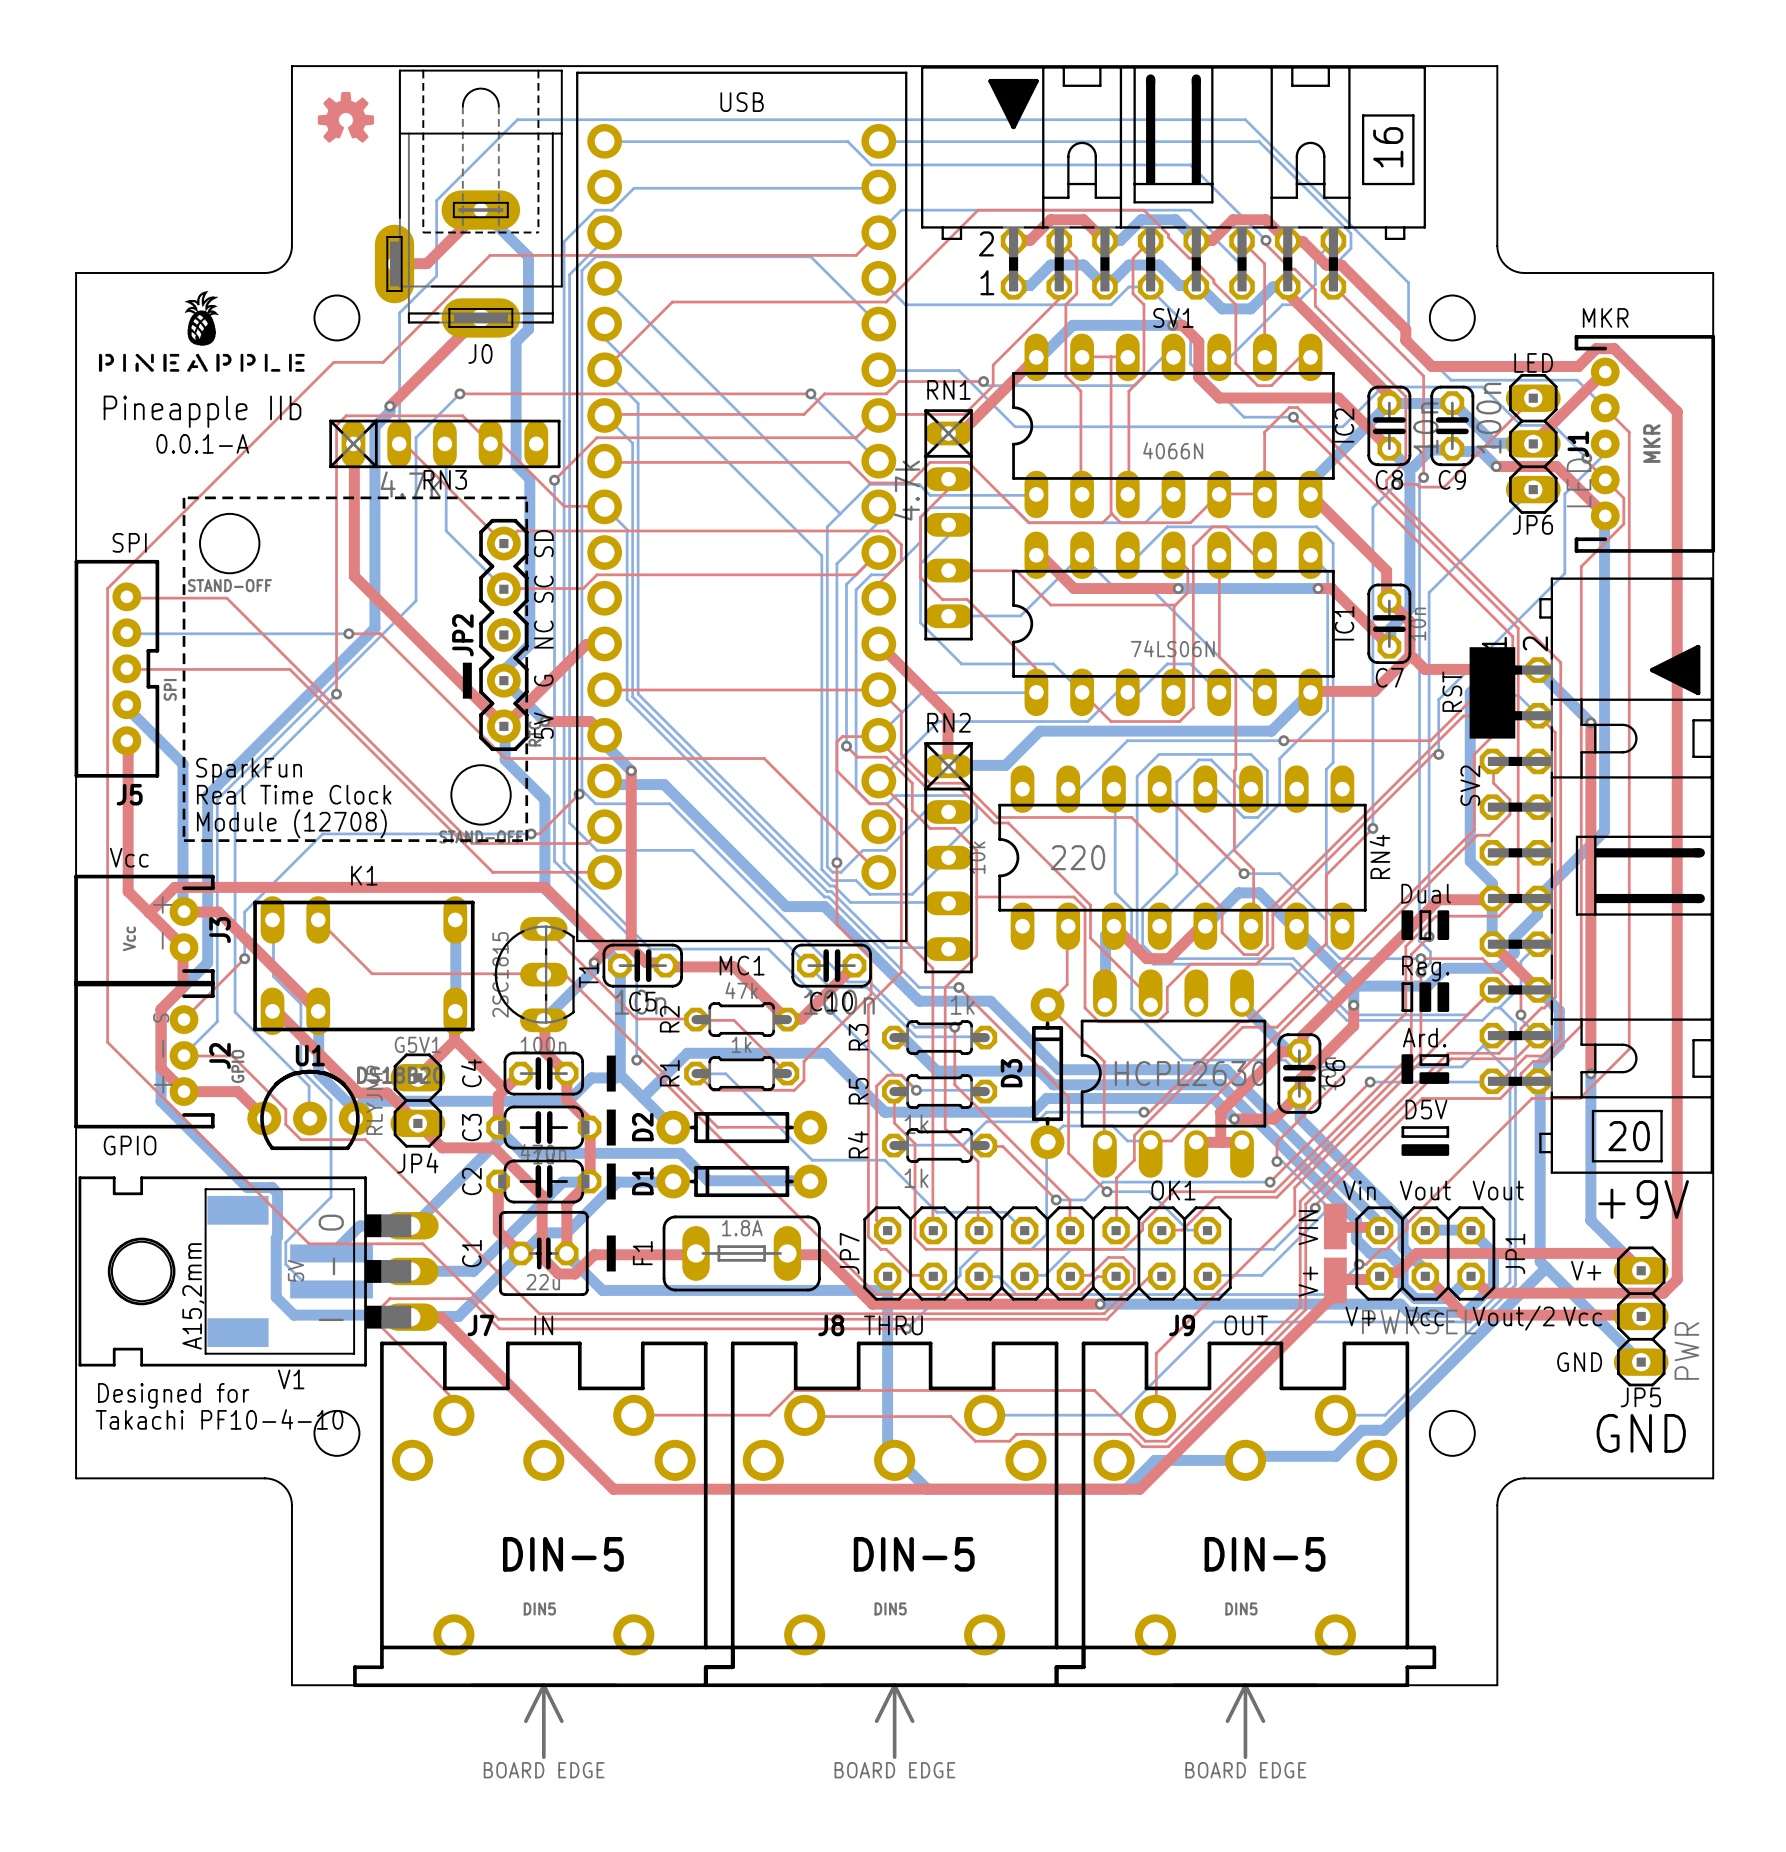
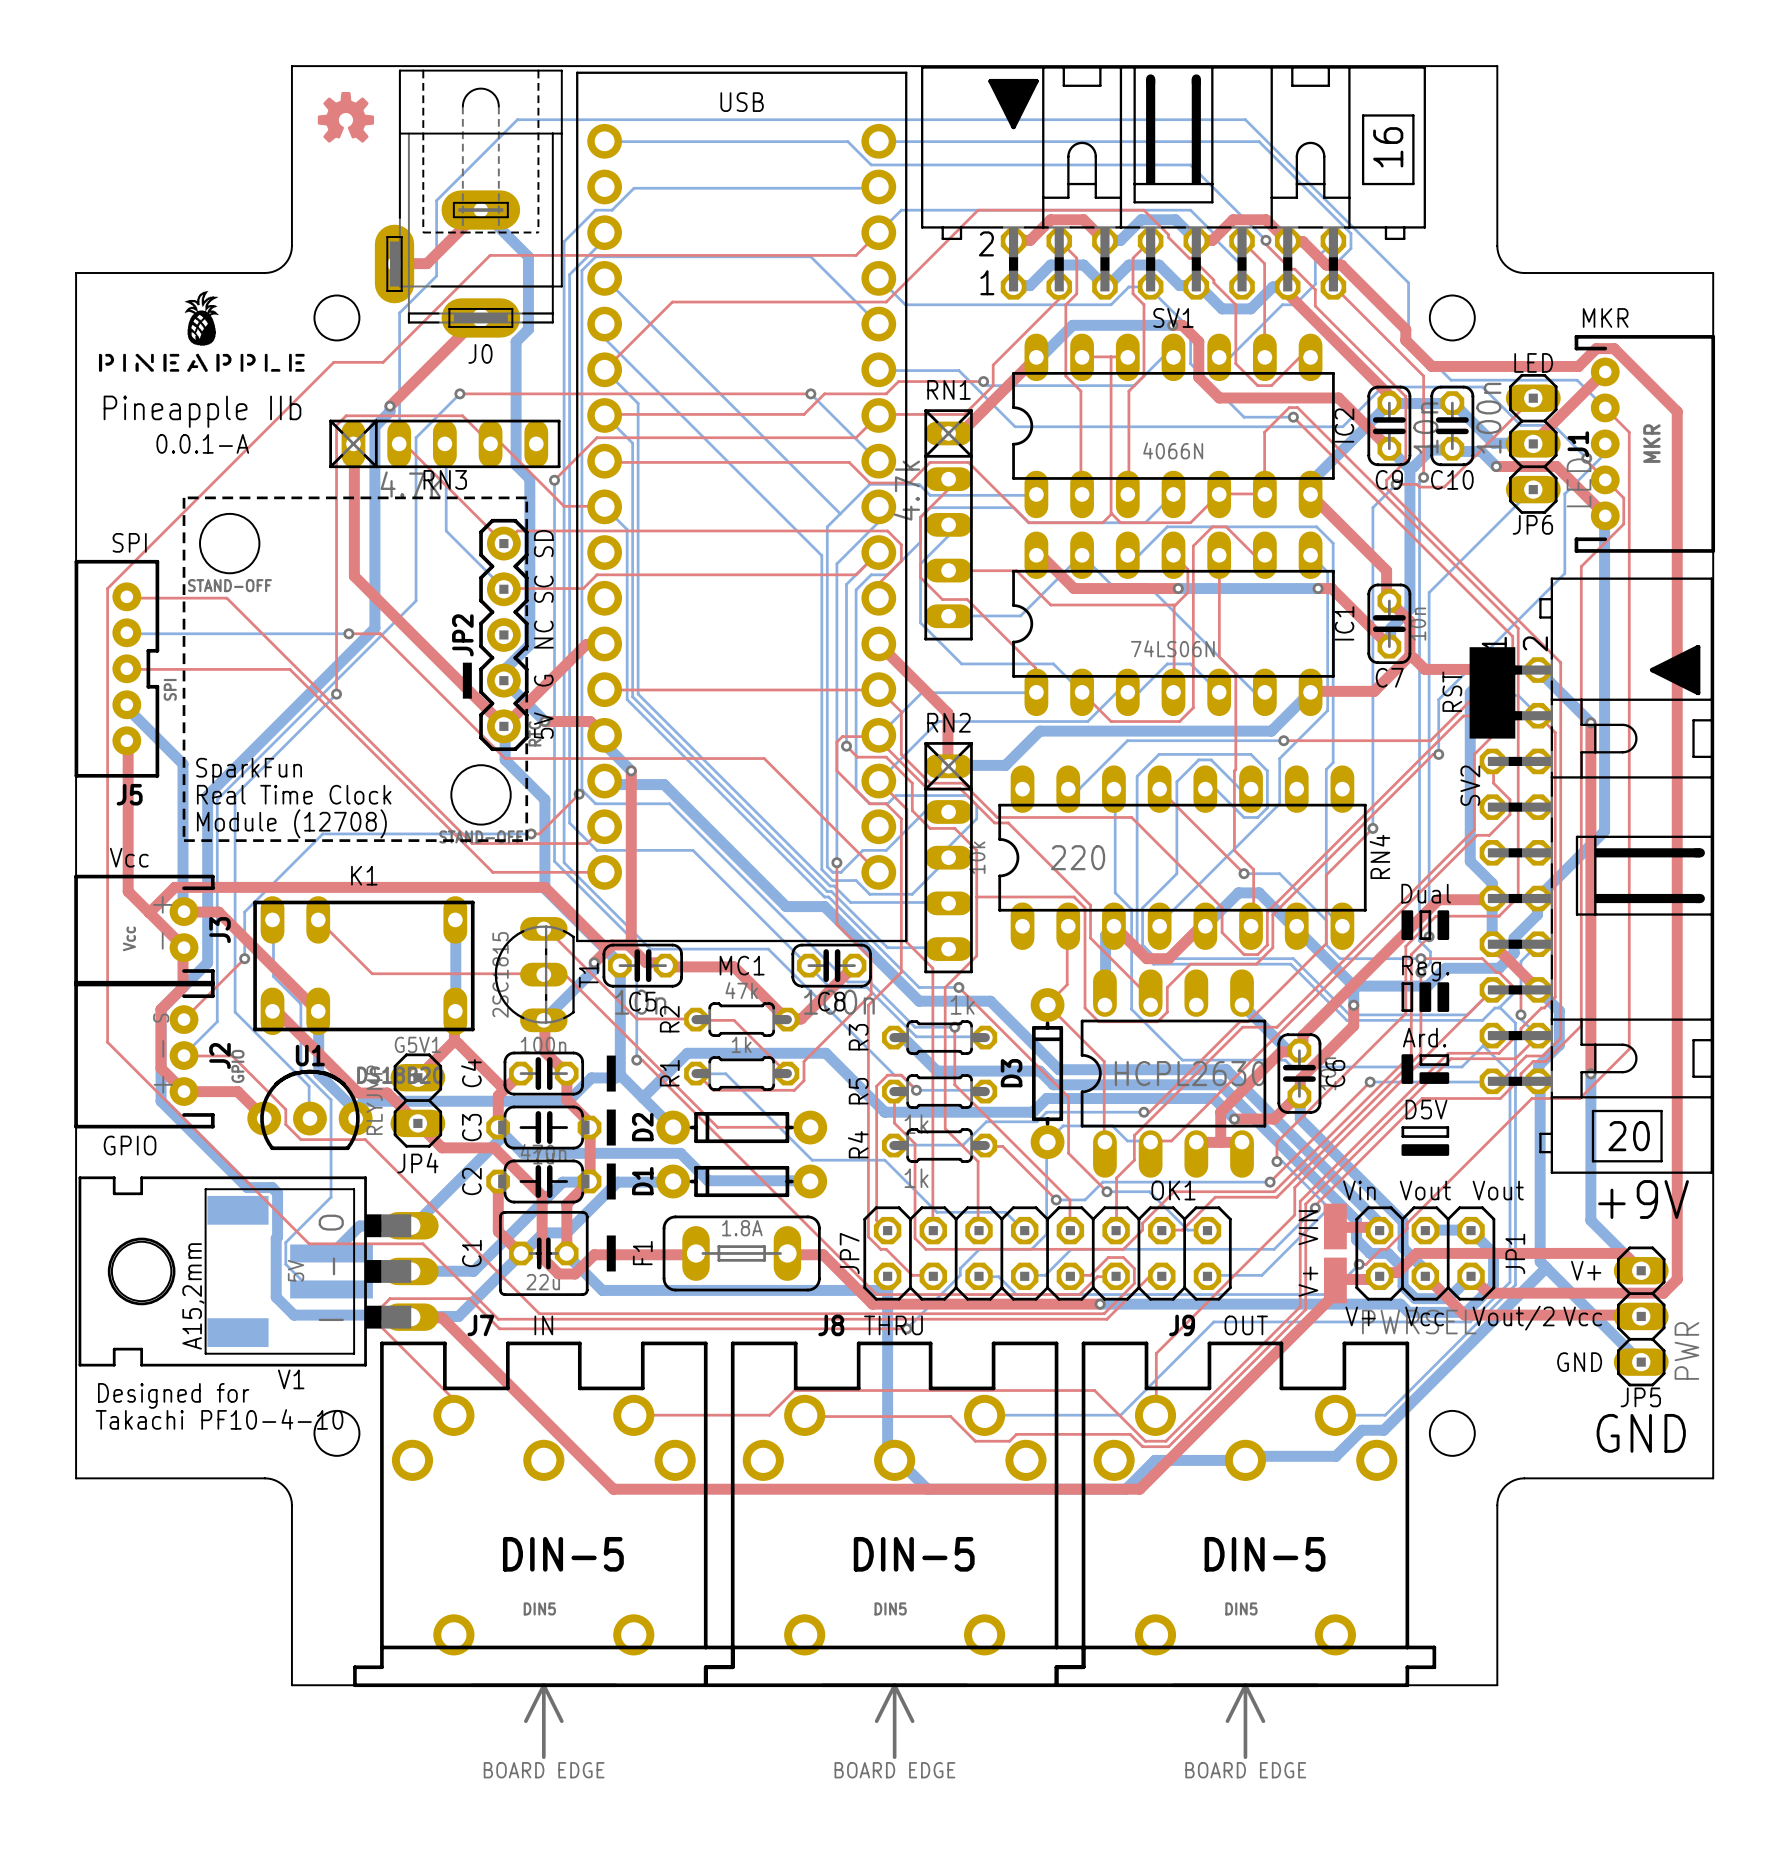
C8 name: C8 (1389, 479) -> C9 (1389, 479)
C9 name: C9 (1452, 479) -> C10 (1452, 479)
C10 name: C10 (831, 1001) -> C8 (831, 1001)

